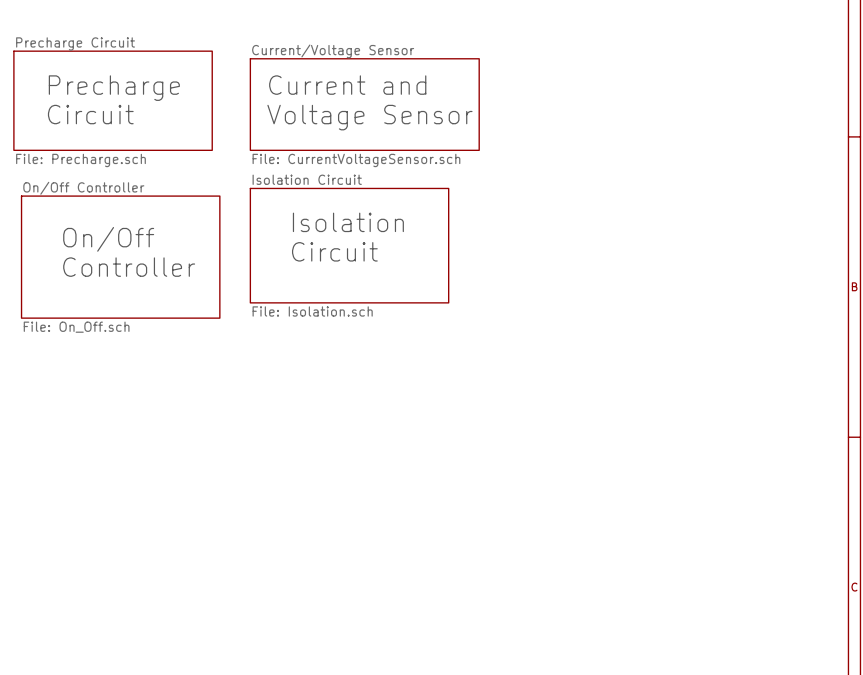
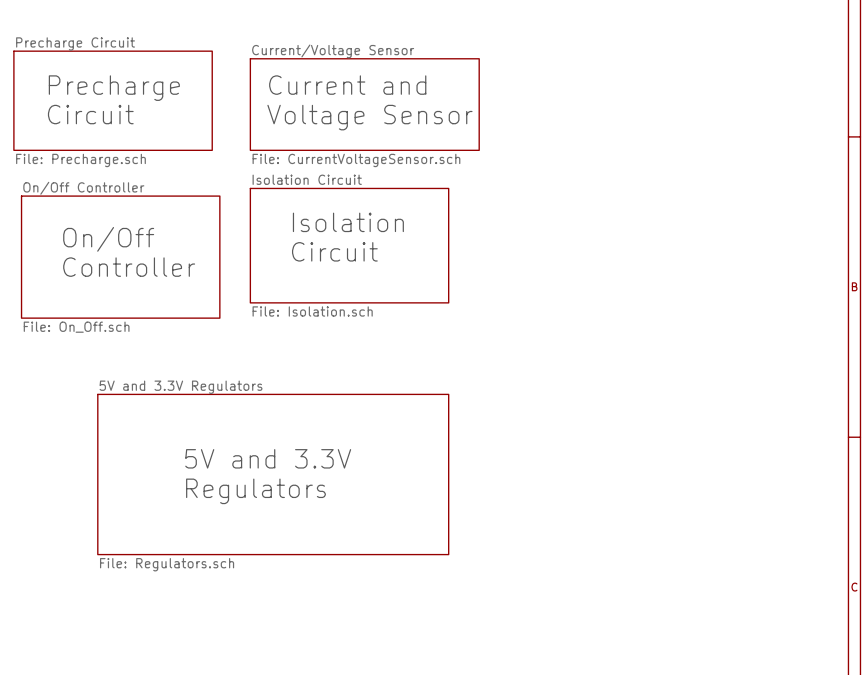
text: none -> 5V and 3.3V (268, 458)
sheet 5V and 3.3V Regulators: none -> File: Regulators.sch (273, 474)
text: none -> Regulators (255, 491)

